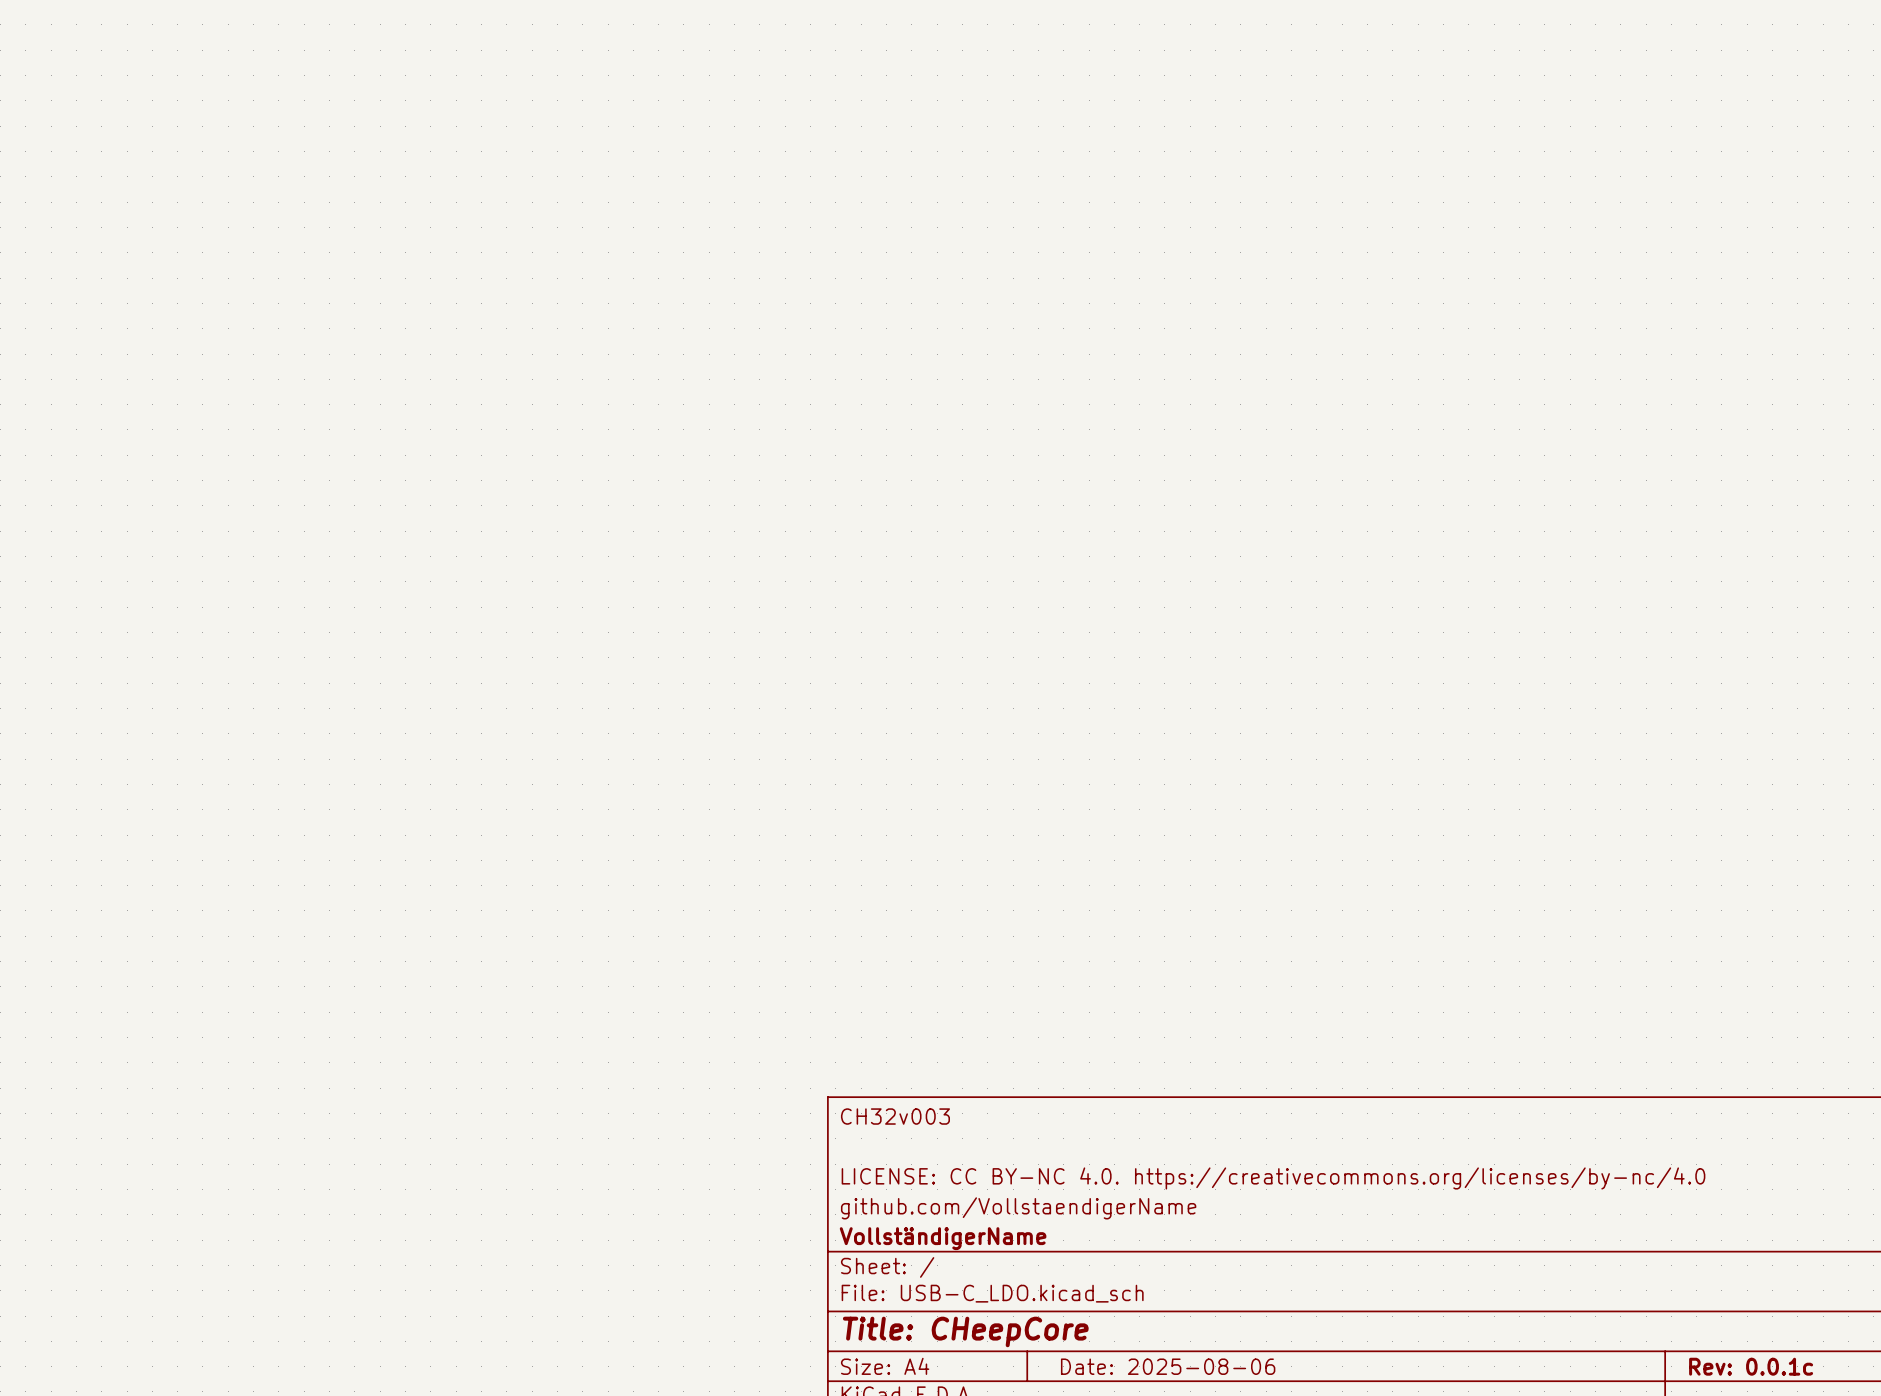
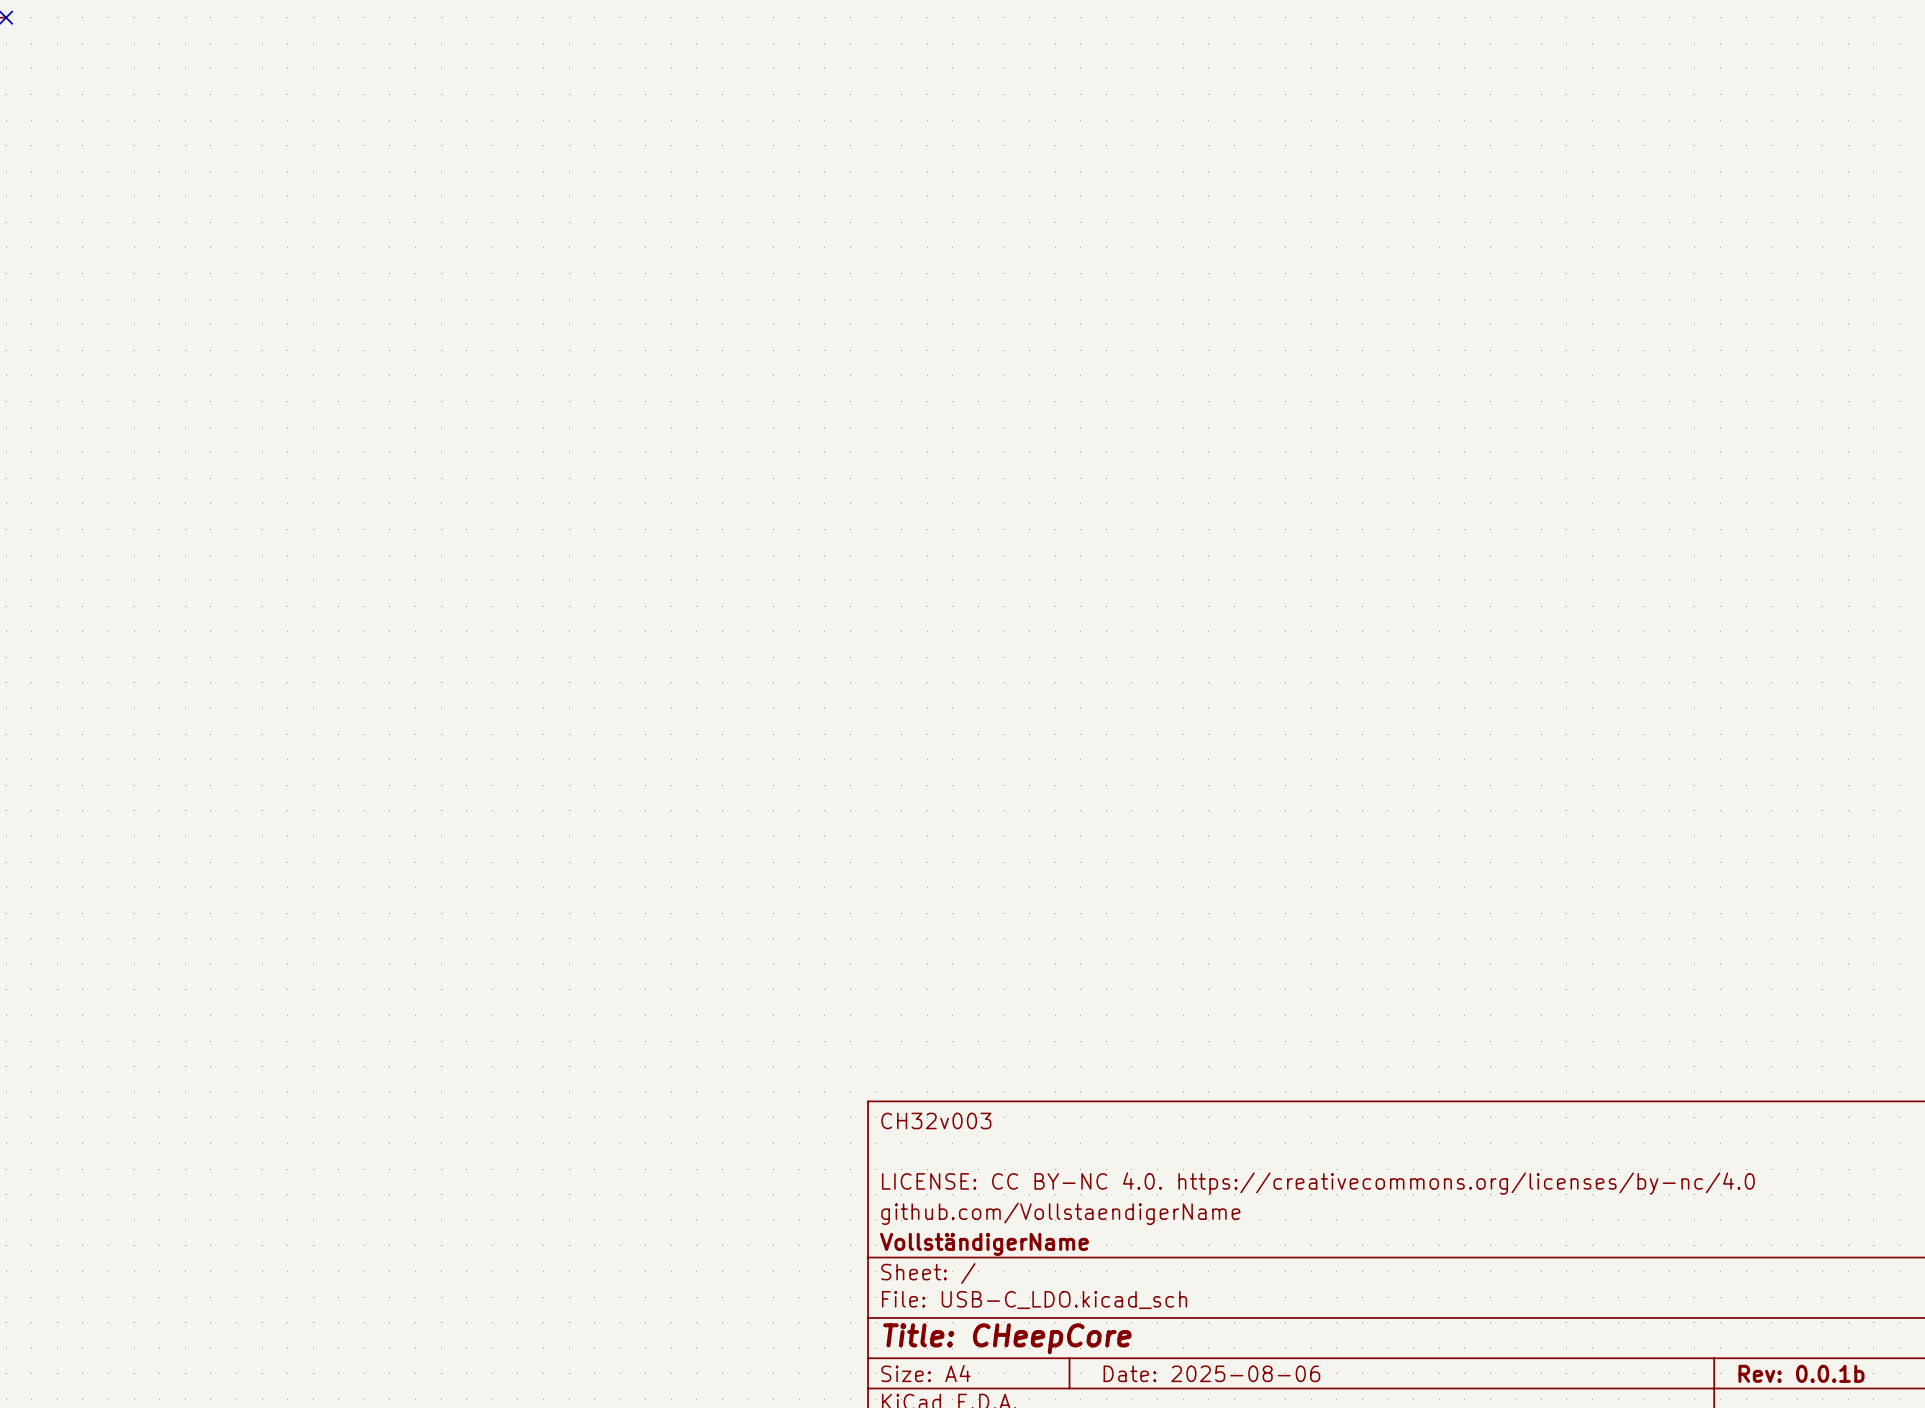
title block: Rev: 0.0.1c (1751, 1366) -> Rev: 0.0.1b (1801, 1373)

